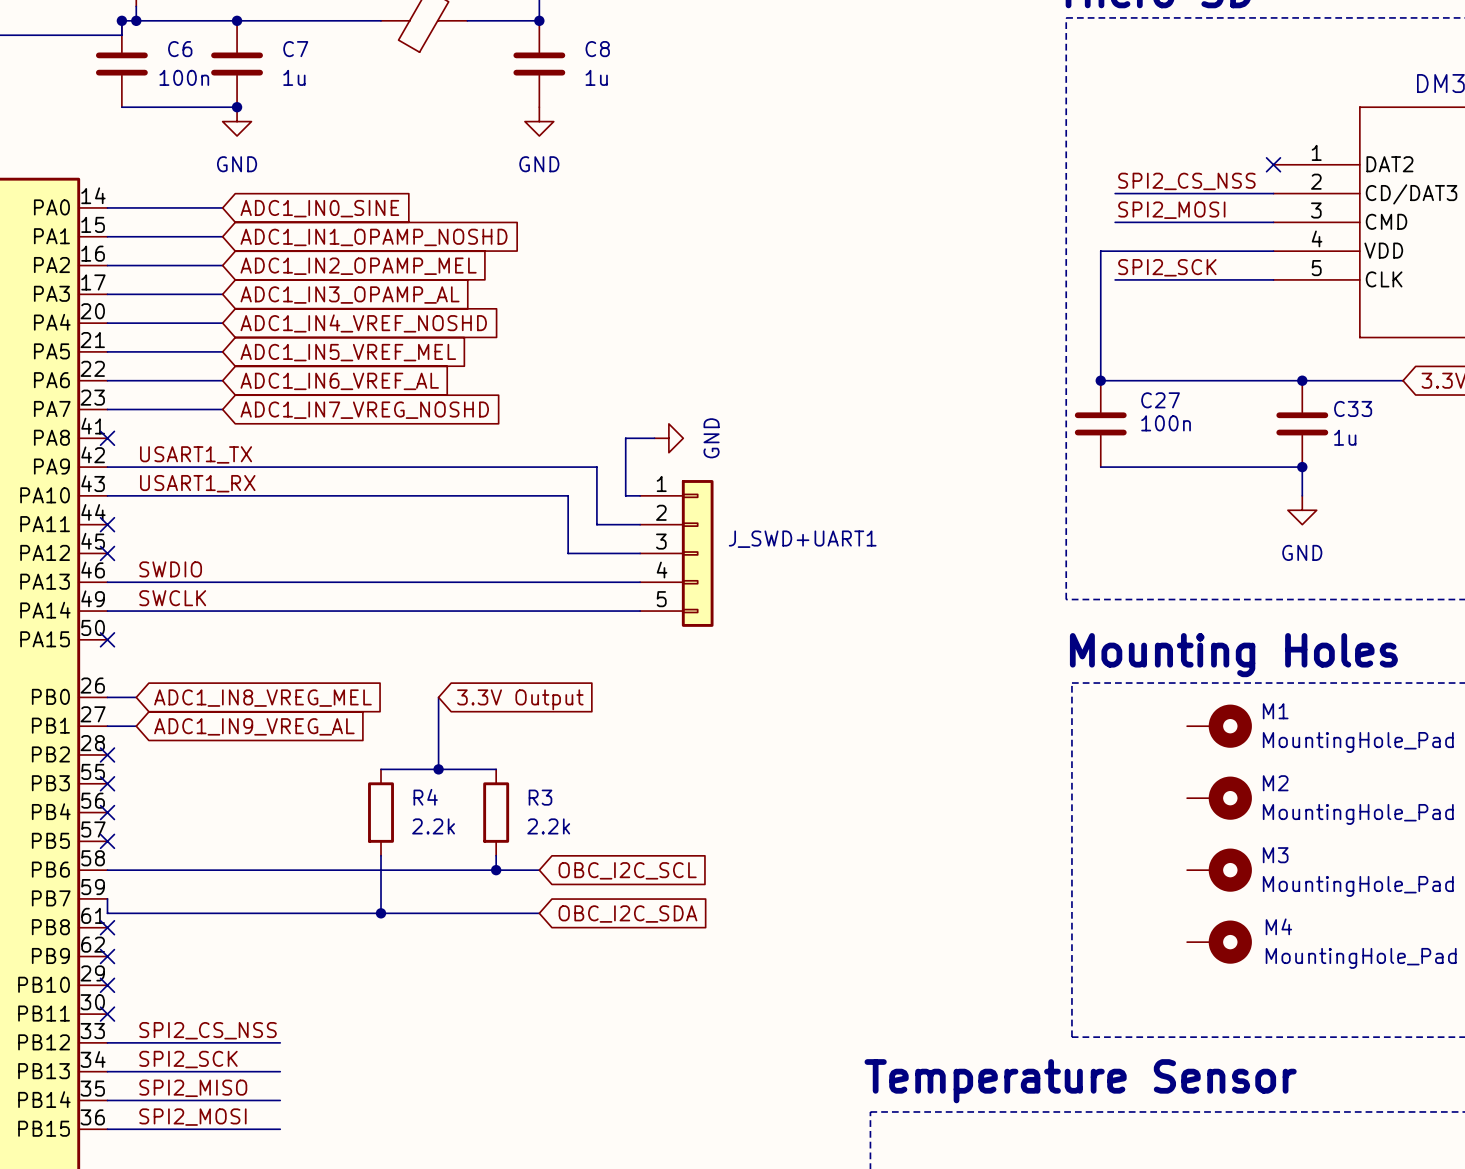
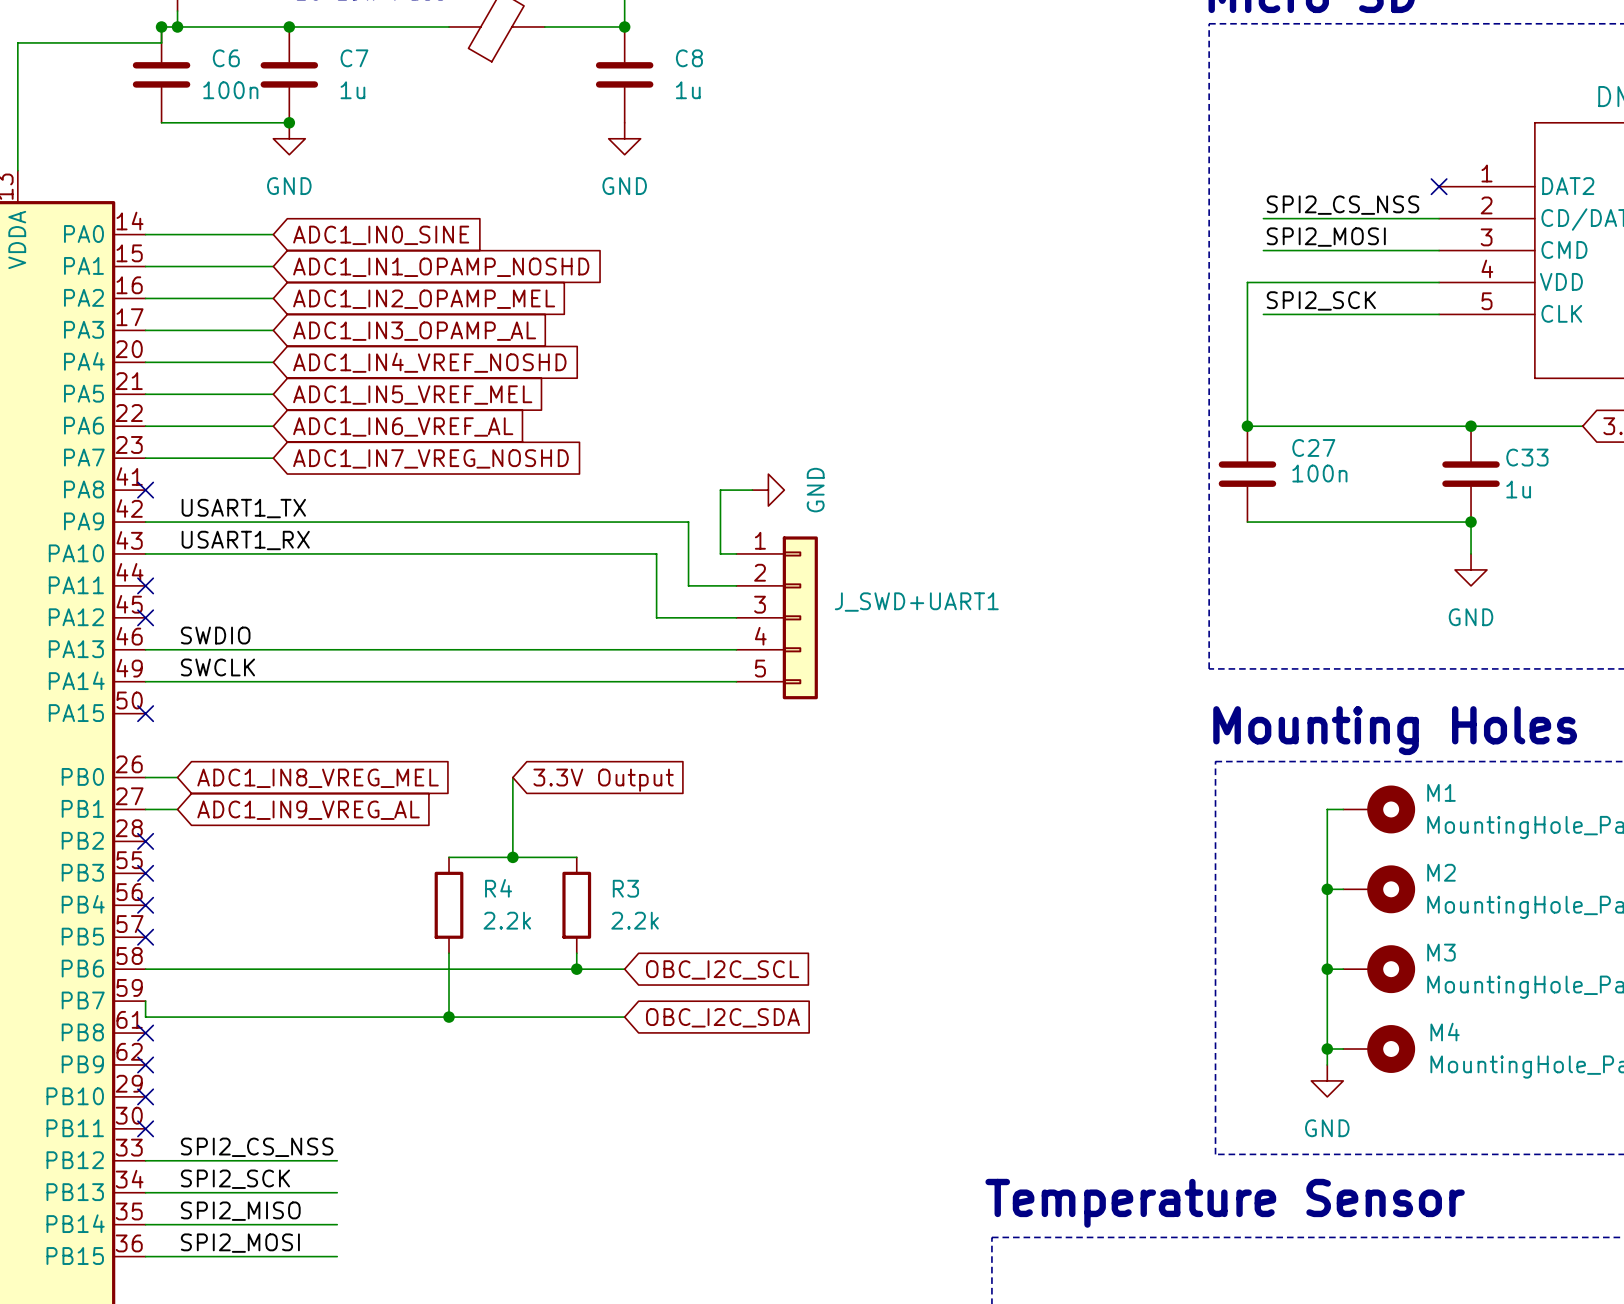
wire: none -> (1343, 809) (1327, 809) (1327, 1064)
wire: none -> (1327, 889) (1343, 889)
junction: none -> (1327, 889)
wire: none -> (1327, 969) (1343, 969)
junction: none -> (1327, 969)
wire: none -> (1327, 1049) (1343, 1049)
junction: none -> (1327, 1049)
power symbol: none -> GND (1327, 1080)

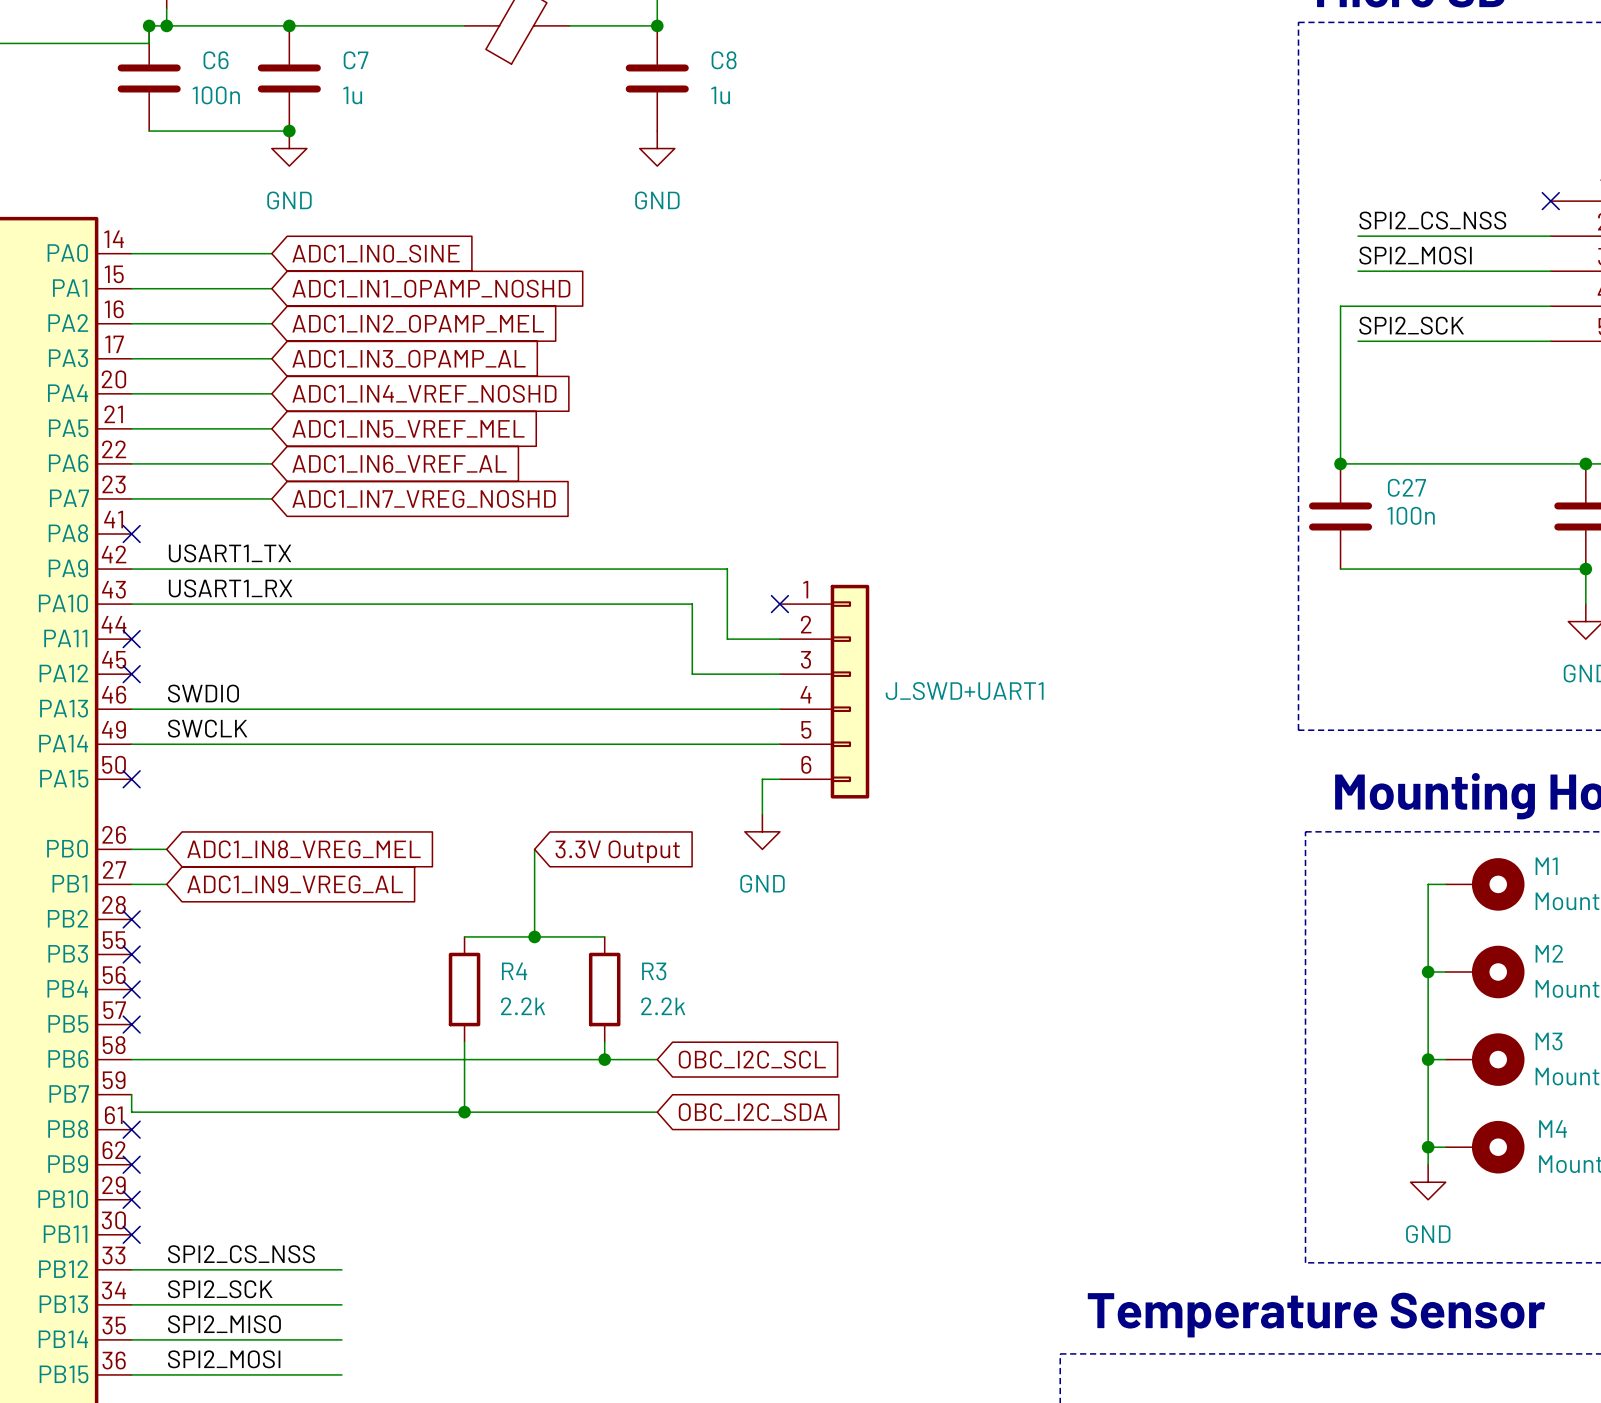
wire: (752, 490) (720, 490) (720, 553) (736, 553) -> none
power symbol rotation: 0° (768, 490) -> 90° clockwise (762, 831)
power symbol position: GND (768, 490) -> GND (762, 831)
J_SWD+UART1 symbol: [736, 536, 818, 700] -> [779, 584, 870, 799]
no-connect mark: none -> (779, 604)
wire: none -> (779, 779) (762, 779) (762, 814)

